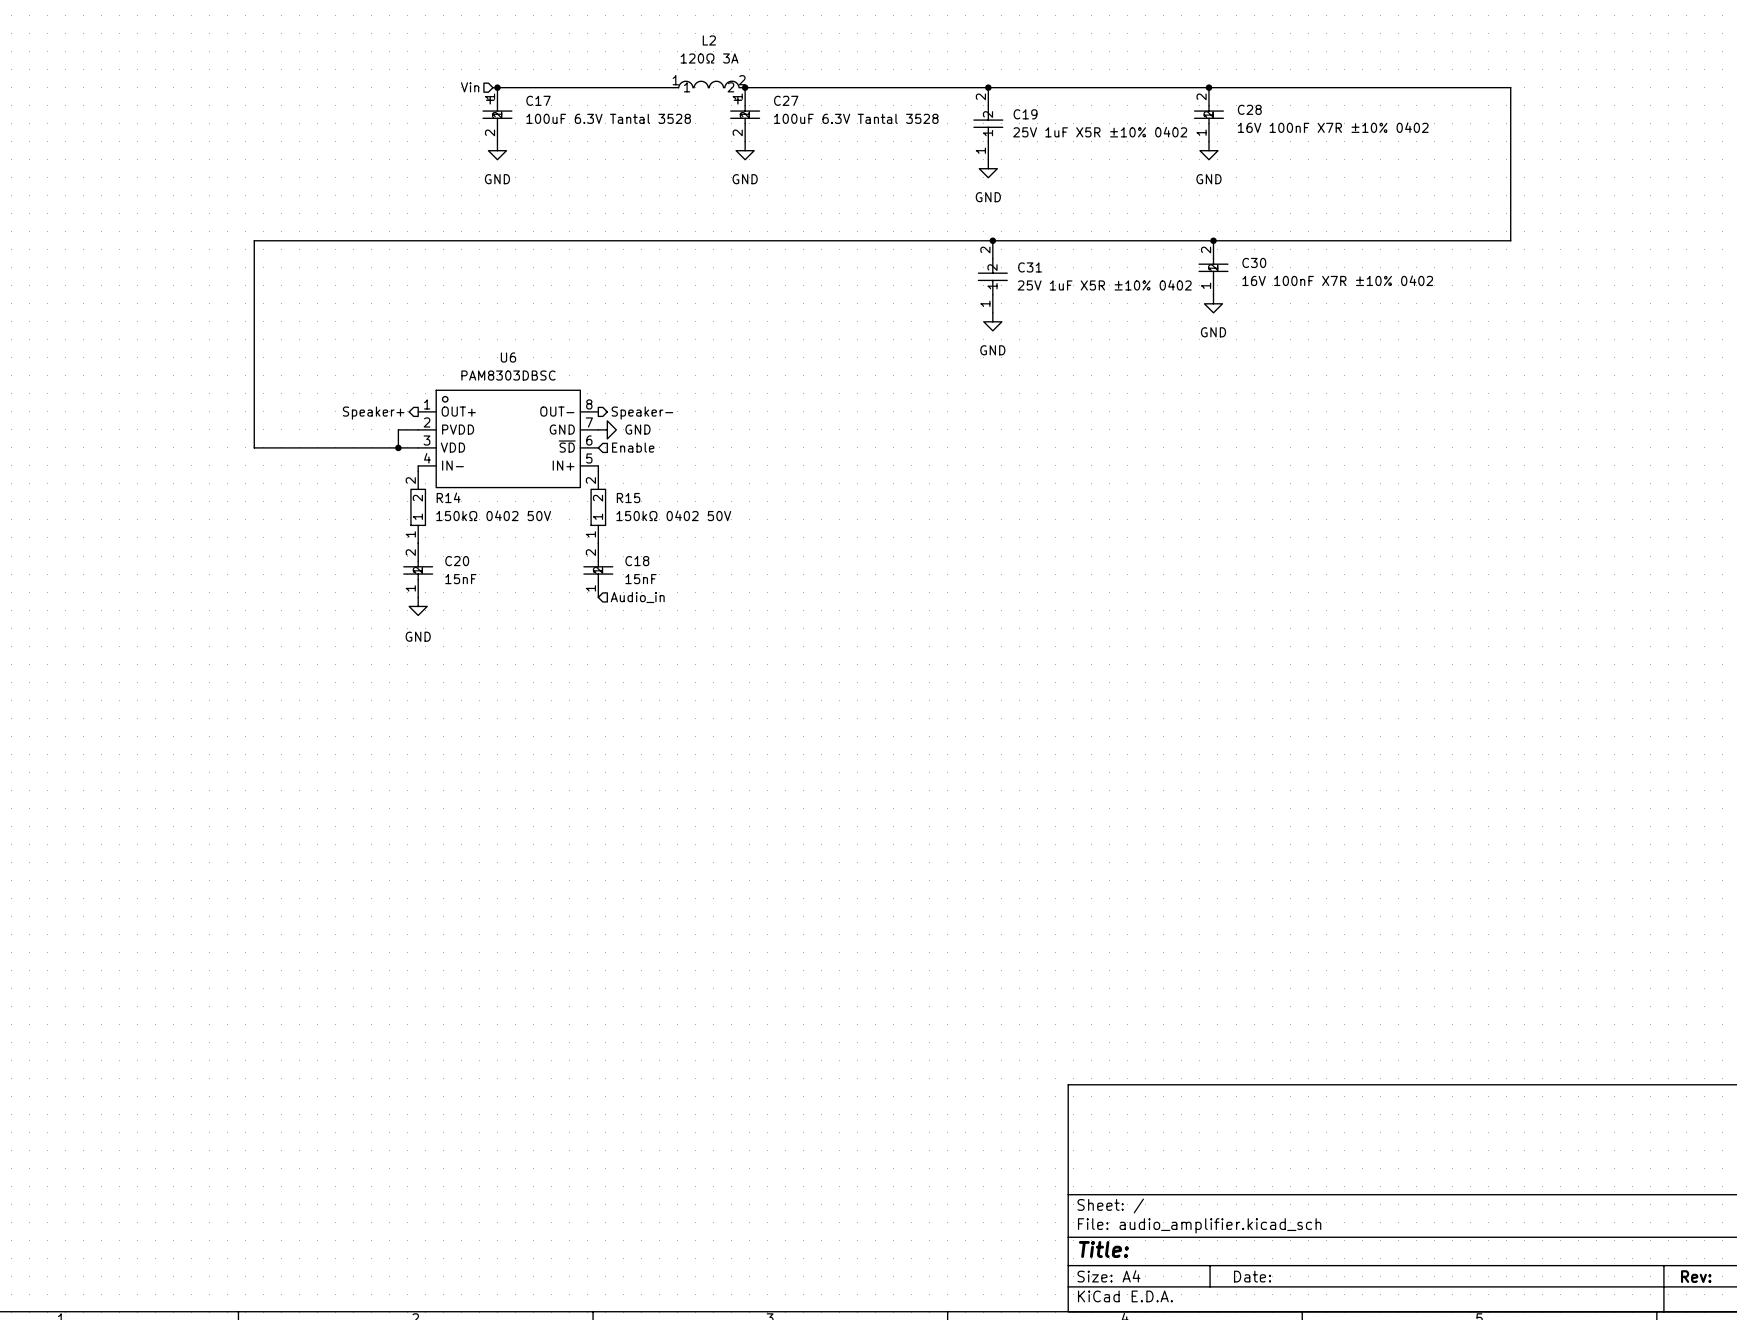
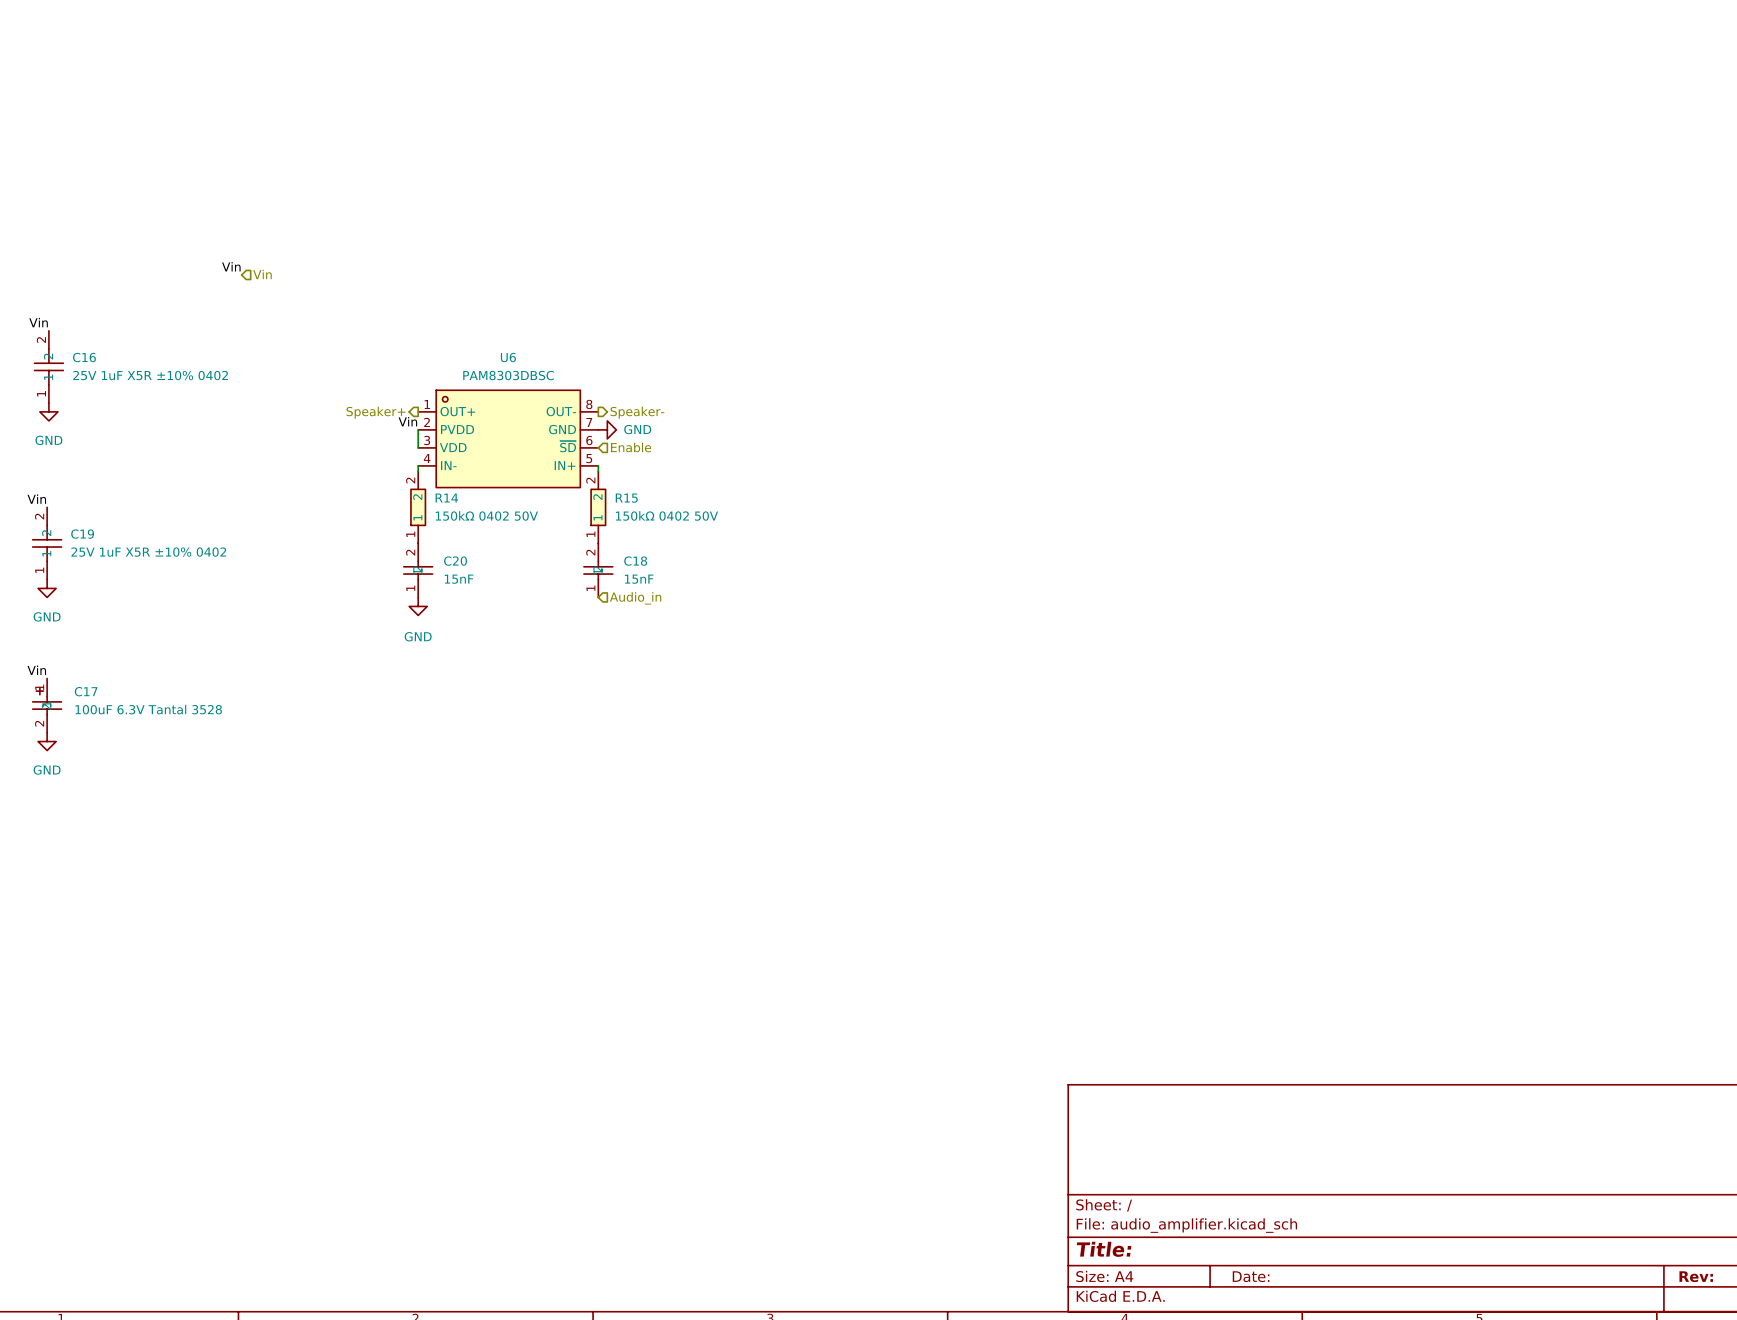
L2: 120Ω 3A (709, 84) -> none
hierarchical label: Vin (470, 87) -> none
wire: (492, 87) (673, 87) -> none
junction: (497, 87) -> none
wire: (745, 87) (1510, 87) (1510, 240) (254, 240) (254, 447) (418, 447) -> none
junction: (745, 87) -> none
junction: (988, 87) -> none
junction: (1208, 87) -> none
C17 position: (497, 114) -> (47, 705)
C27: 100uF 6.3V Tantal 3528 (745, 114) -> none
C28: 16V 100nF X7R ±10% 0402 (1208, 114) -> none
C19 position: (988, 123) -> (47, 543)
power symbol: GND (497, 150) -> none
power symbol: GND (745, 150) -> none
power symbol: GND (1208, 150) -> none
power symbol: GND (988, 168) -> none
junction: (992, 240) -> none
junction: (1213, 240) -> none
label: none -> Vin (231, 266)
C30: 16V 100nF X7R ±10% 0402 (1213, 267) -> none
hierarchical label: none -> Vin (262, 274)
C31: 25V 1uF X5R ±10% 0402 (992, 276) -> none
power symbol: GND (1213, 303) -> none
power symbol: GND (992, 321) -> none
label: none -> Vin (38, 322)
C16: none -> 25V 1uF X5R ±10% 0402 (48, 366)
power symbol: none -> GND (48, 411)
label: none -> Vin (407, 421)
wire: (418, 429) (398, 429) (398, 447) -> (418, 429) (418, 447)
junction: (398, 447) -> none
label: none -> Vin (36, 499)
power symbol: none -> GND (47, 588)
label: none -> Vin (36, 670)
power symbol: none -> GND (47, 741)

